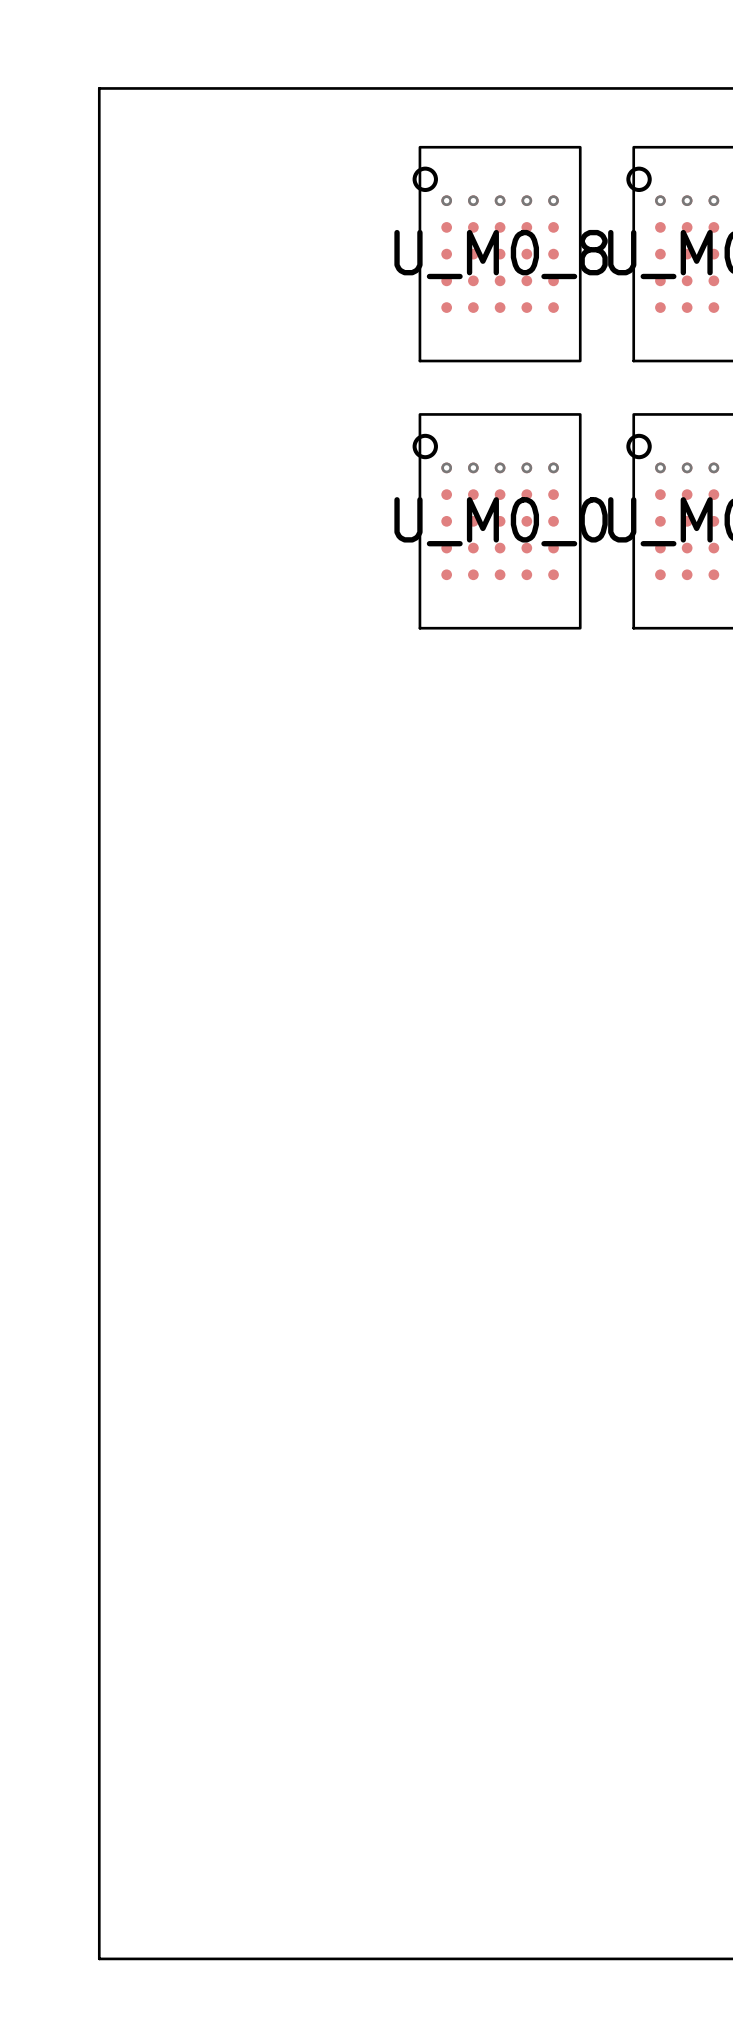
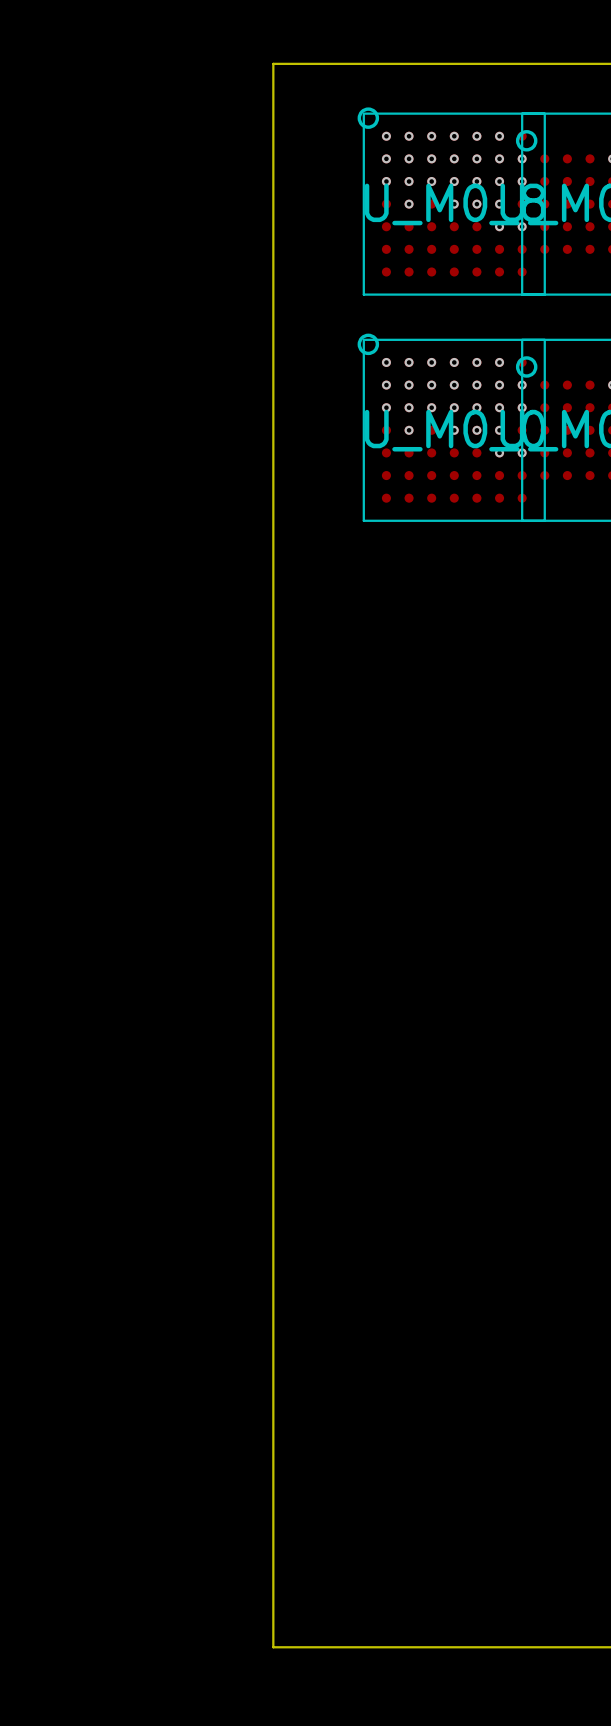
board edge: (339, 88) (99, 88) (99, 1958) (339, 1958) -> (273, 63) (273, 1647)
U_M0_8 footprint: [412, 145, 582, 363] -> [357, 107, 546, 296]
via: none -> (386, 136)
via: none -> (409, 136)
via: none -> (431, 136)
via: none -> (454, 136)
via: none -> (476, 136)
via: none -> (499, 136)
via: (446, 200) -> none
via: none -> (476, 158)
via: none -> (499, 158)
via: none -> (522, 158)
via: (660, 200) -> none
via: (687, 200) -> none
via: (713, 200) -> none
via: none -> (386, 181)
via: none -> (409, 181)
via: none -> (431, 181)
via: none -> (454, 181)
via: none -> (476, 181)
via: none -> (499, 181)
via: none -> (522, 181)
via: none -> (409, 204)
via: none -> (454, 204)
via: none -> (476, 204)
via: none -> (499, 204)
via: none -> (499, 226)
via: none -> (522, 226)
U_M0_0 footprint: [412, 413, 582, 630] -> [357, 333, 546, 522]
via: none -> (386, 362)
via: none -> (409, 362)
via: none -> (431, 362)
via: none -> (454, 362)
via: none -> (476, 362)
via: none -> (499, 362)
via: (446, 467) -> none
via: none -> (476, 385)
via: none -> (499, 385)
via: none -> (522, 385)
via: (660, 467) -> none
via: (687, 467) -> none
via: (713, 467) -> none
via: none -> (386, 407)
via: none -> (409, 407)
via: none -> (431, 407)
via: none -> (454, 407)
via: none -> (476, 407)
via: none -> (499, 407)
via: none -> (522, 407)
via: none -> (409, 430)
via: none -> (454, 430)
via: none -> (476, 430)
via: none -> (499, 430)
via: none -> (499, 452)
via: none -> (522, 452)

